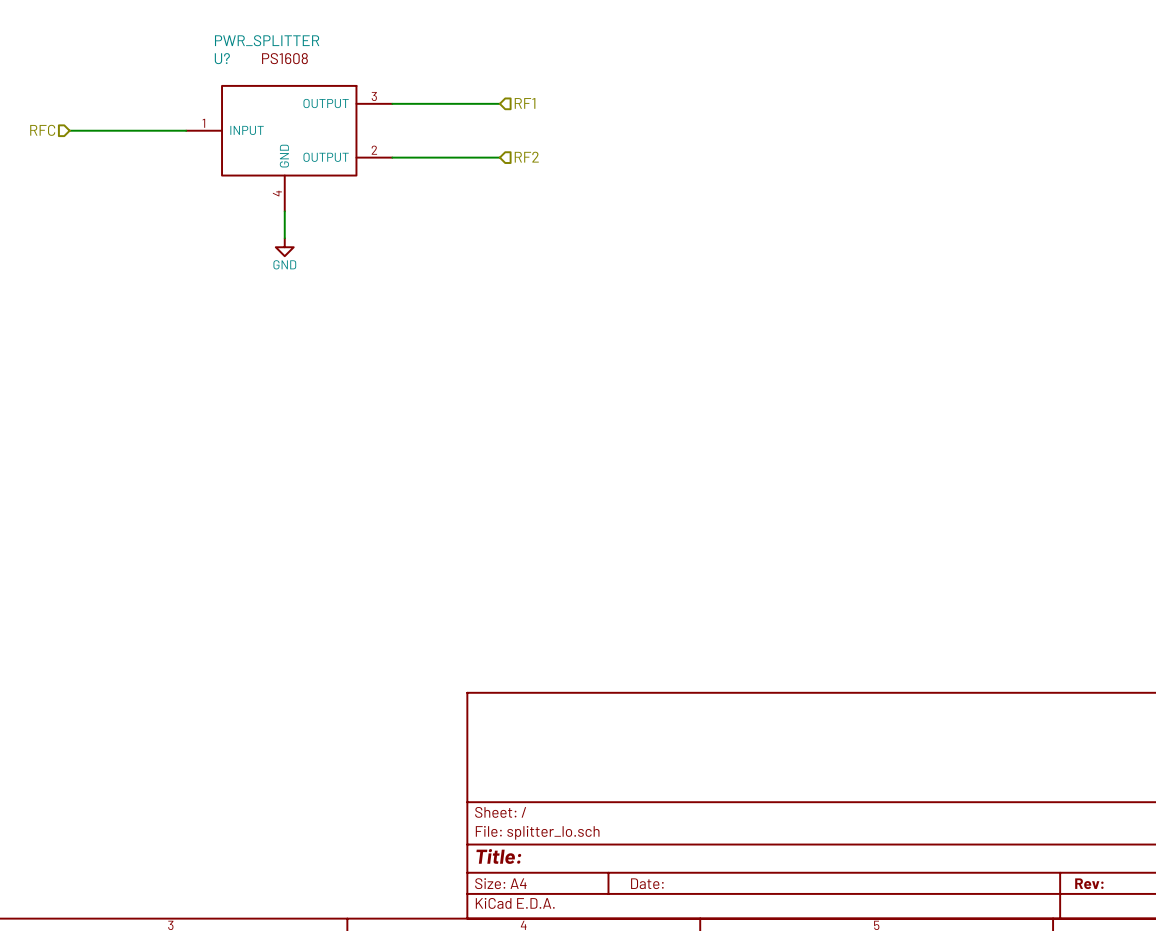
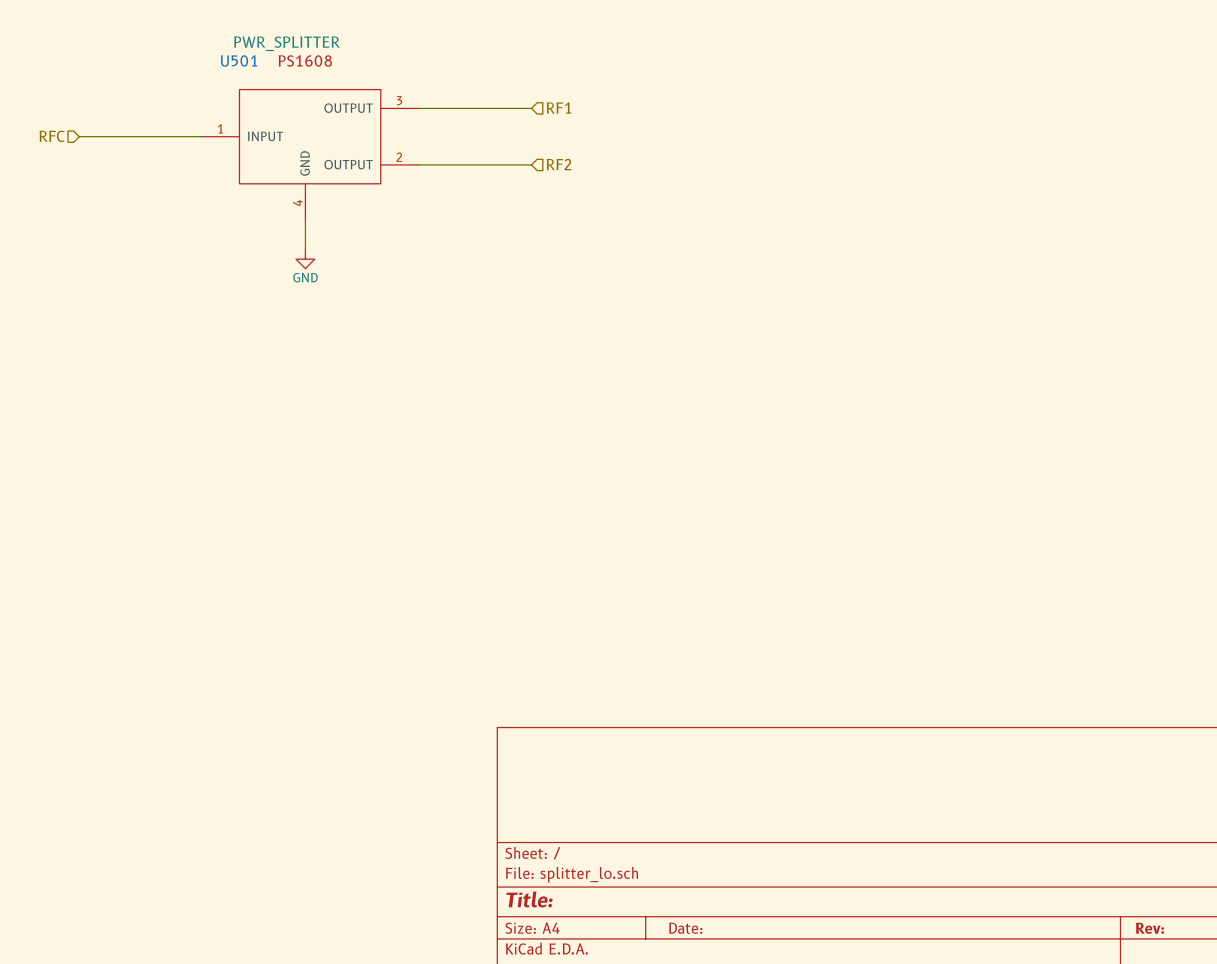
U? name: U? (222, 58) -> U501 (239, 60)

